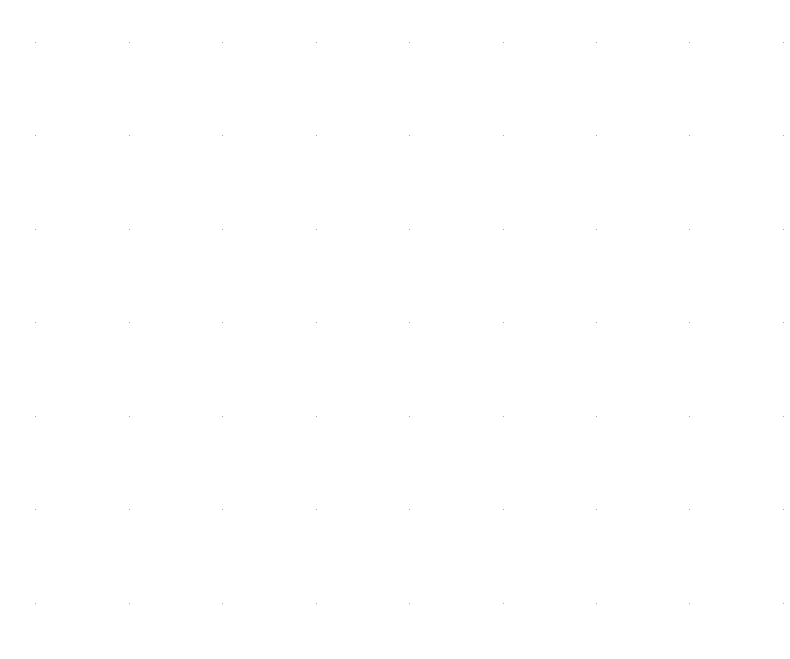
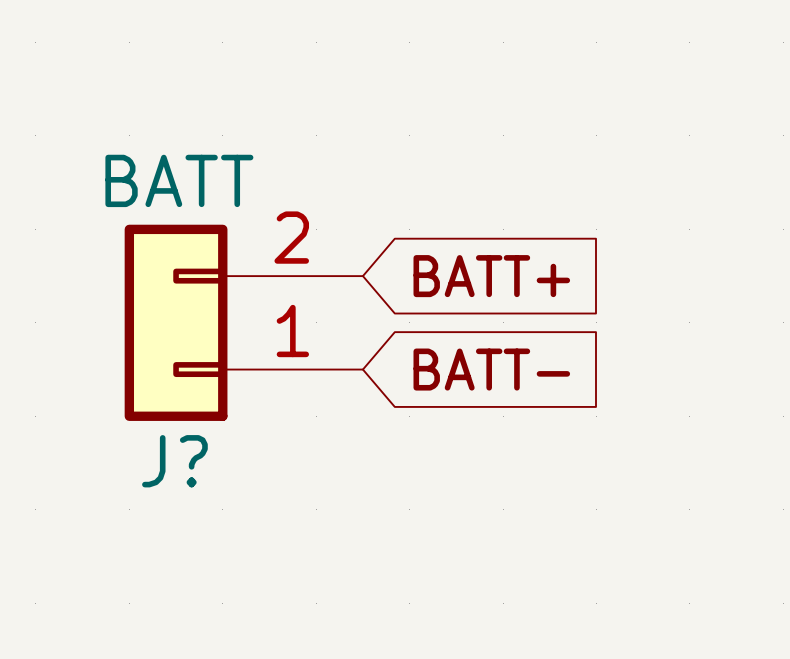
global label: none -> BATT+ (491, 276)
J?: none -> BATT (243, 322)
global label: none -> BATT- (491, 369)

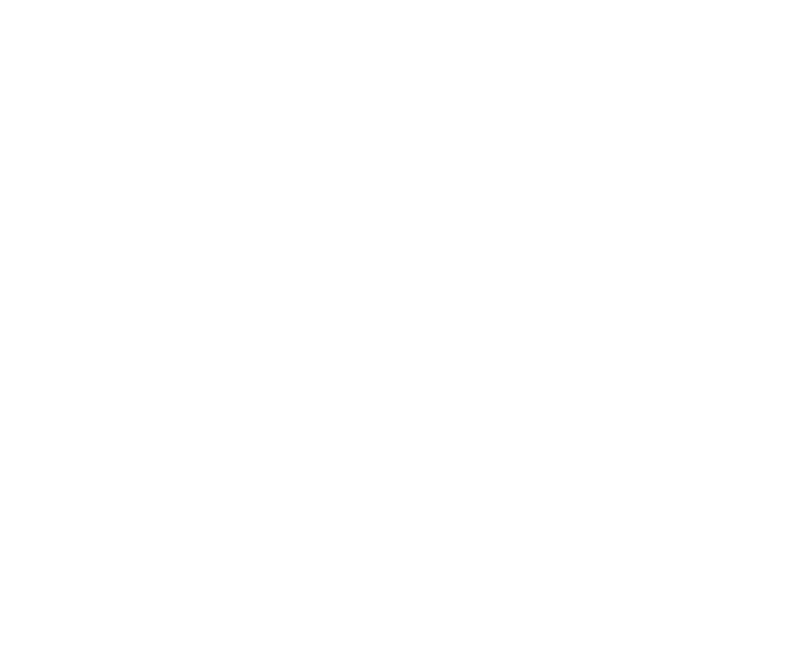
global label: BATT+ (491, 276) -> none
J?: BATT (243, 322) -> none
global label: BATT- (491, 369) -> none

